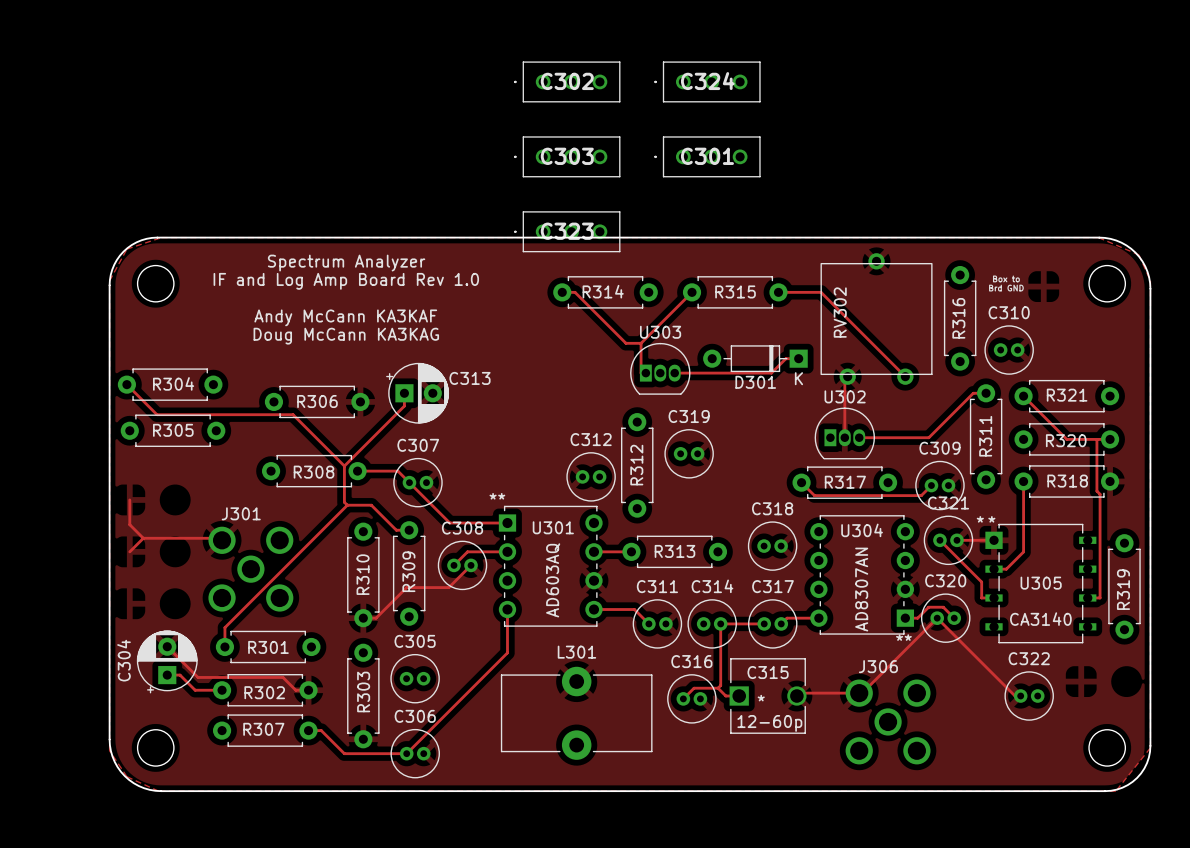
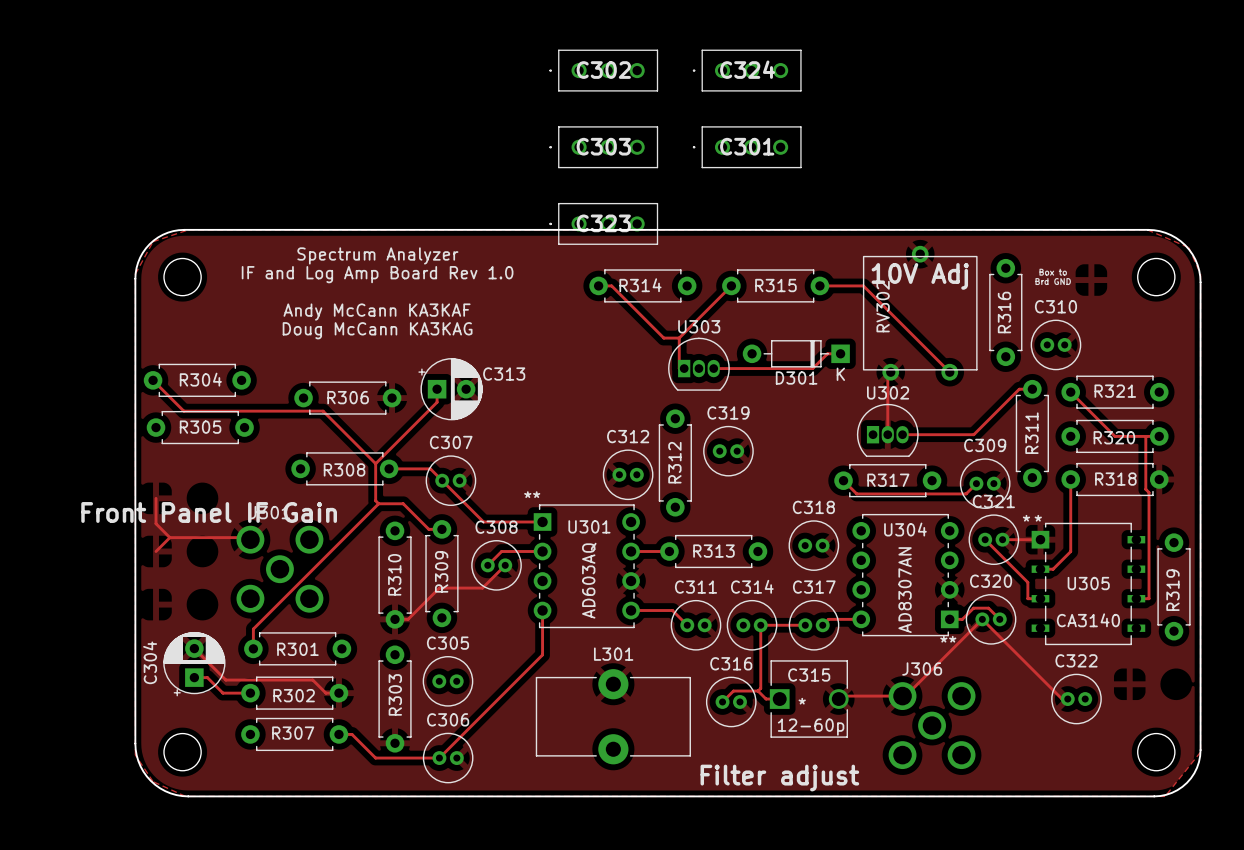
text: none -> 10V Adj (920, 276)
text: none -> Front Panel IF Gain (209, 512)
text: none -> Filter adjust (779, 778)

